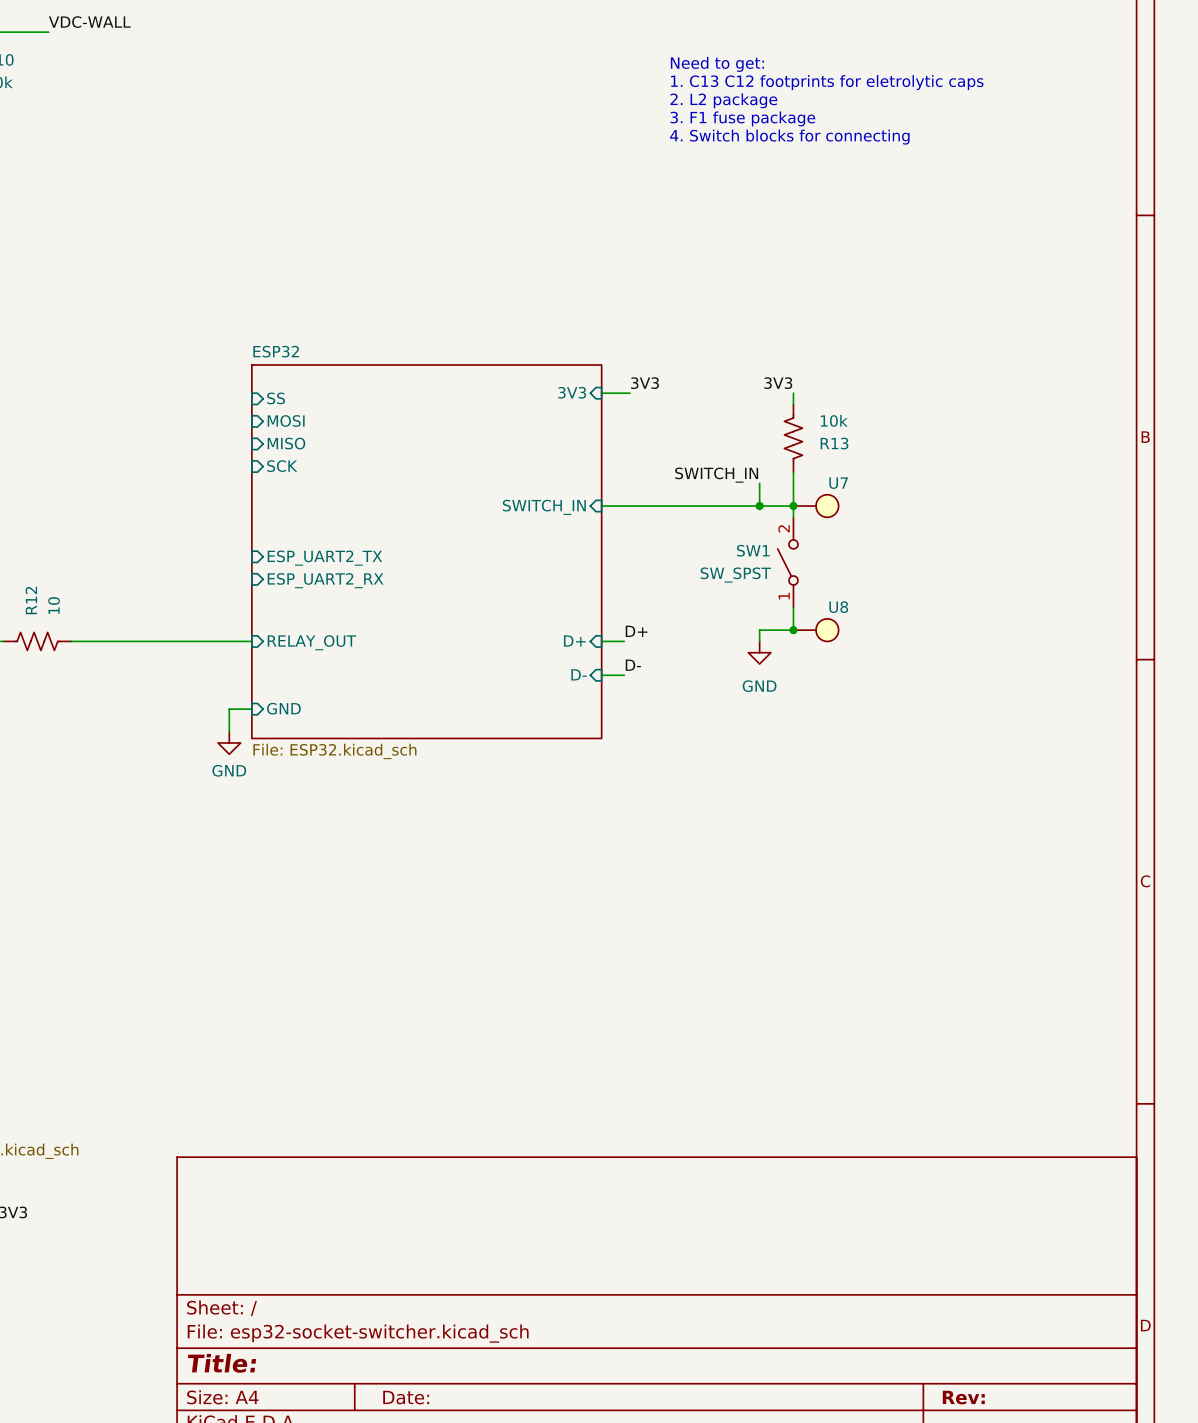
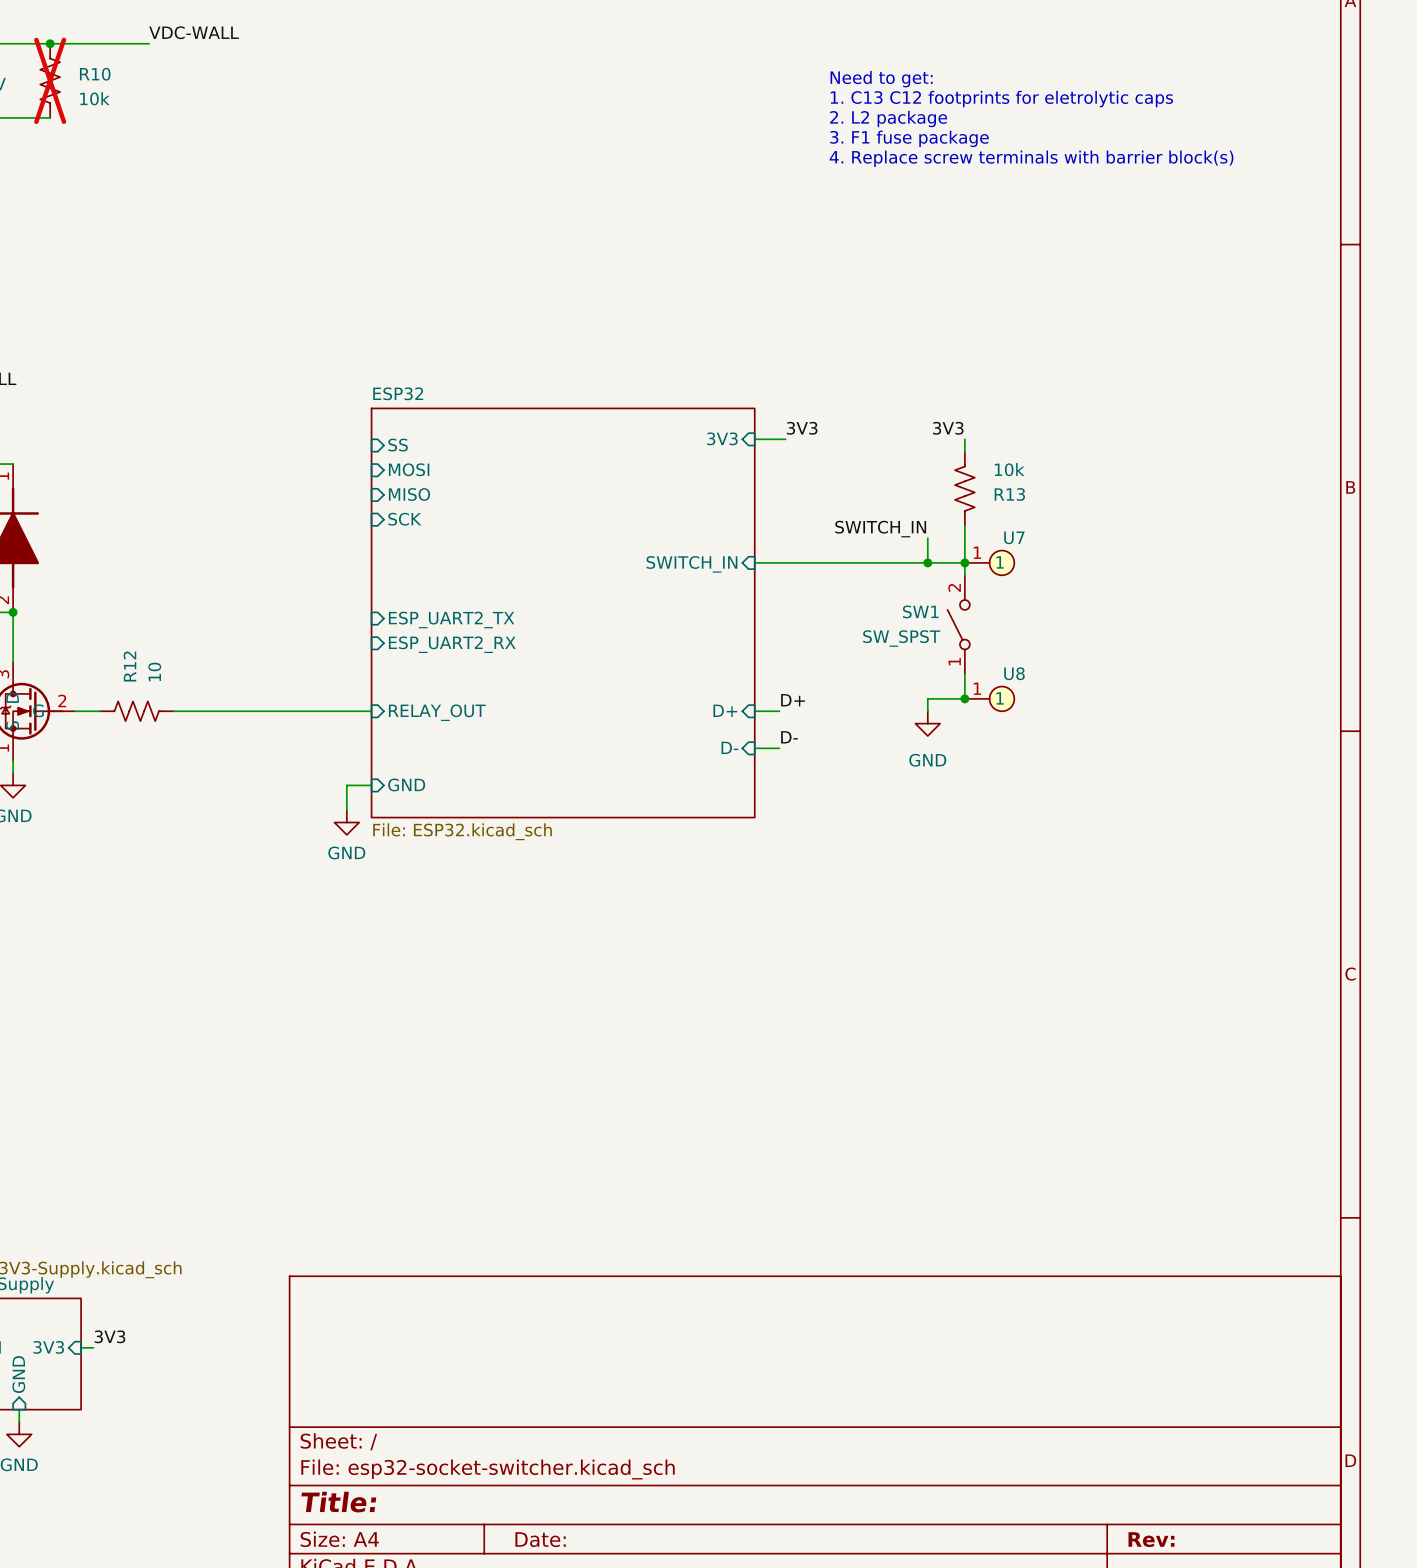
text: 4. Switch blocks for connecting (789, 137) -> 4. Replace screw terminals with barrier block(s) (1031, 158)
U7 pin number: none -> 1 (977, 552)
U7 pin name: none -> 1 (1000, 562)
U8 pin number: none -> 1 (977, 688)
U8 pin name: none -> 1 (1000, 698)

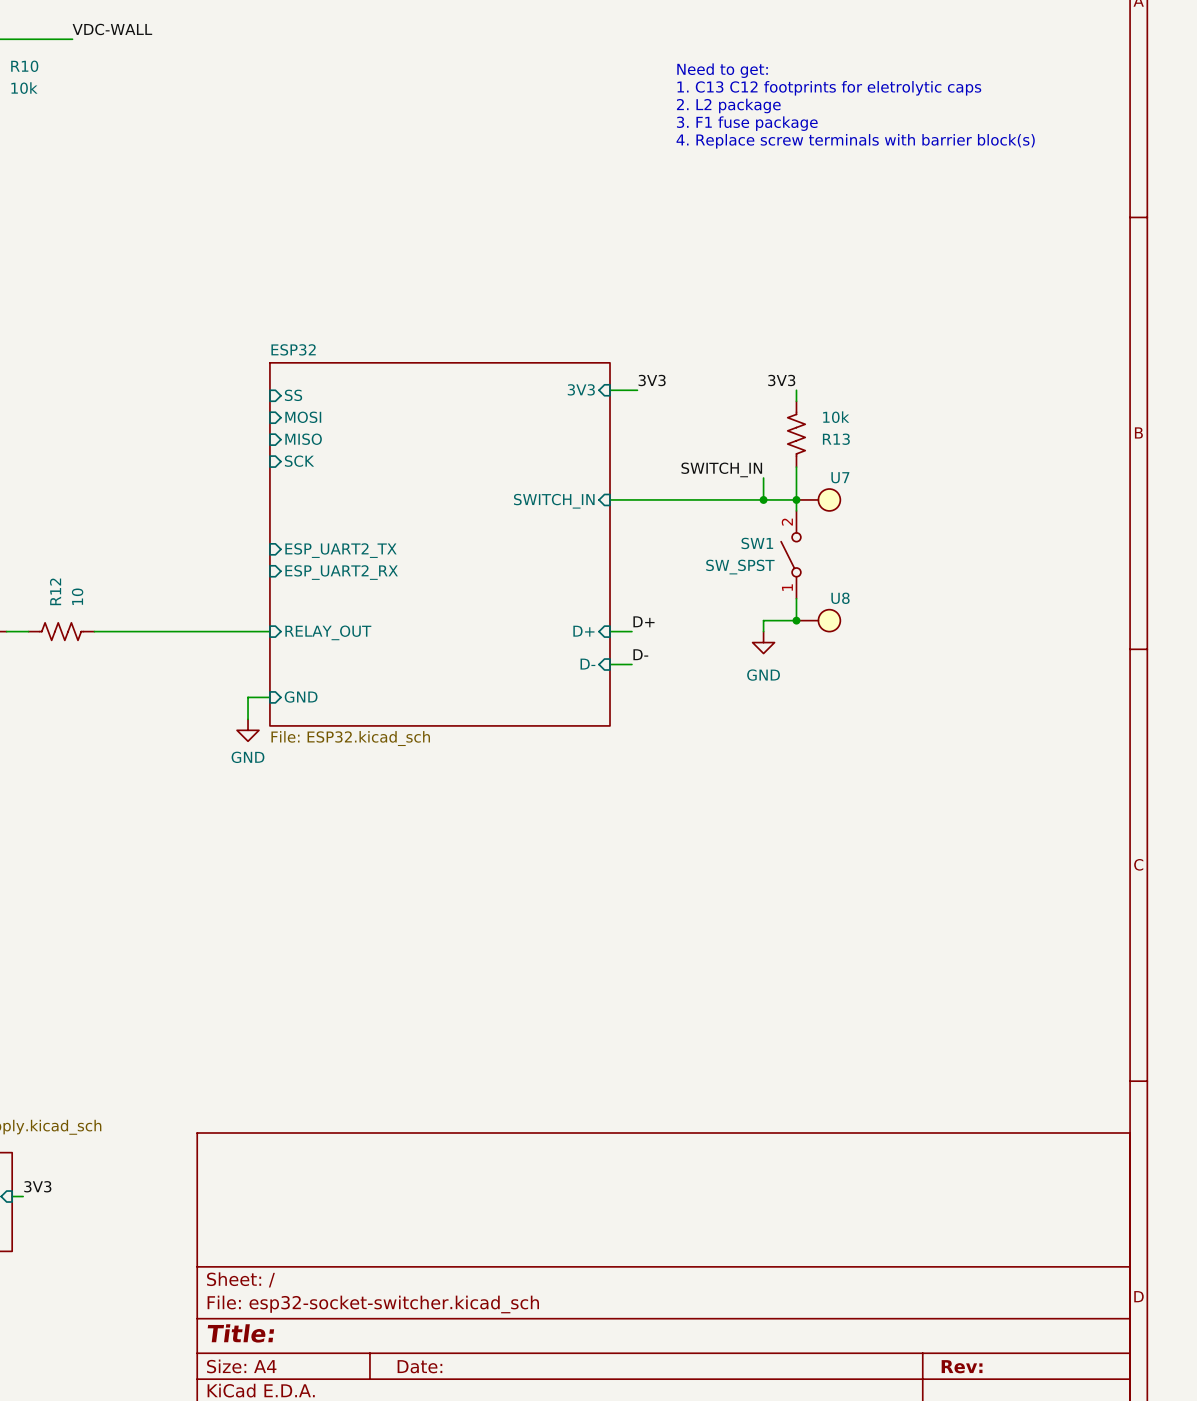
U7 pin number: 1 (977, 552) -> none
U7 pin name: 1 (1000, 562) -> none
U8 pin number: 1 (977, 688) -> none
U8 pin name: 1 (1000, 698) -> none

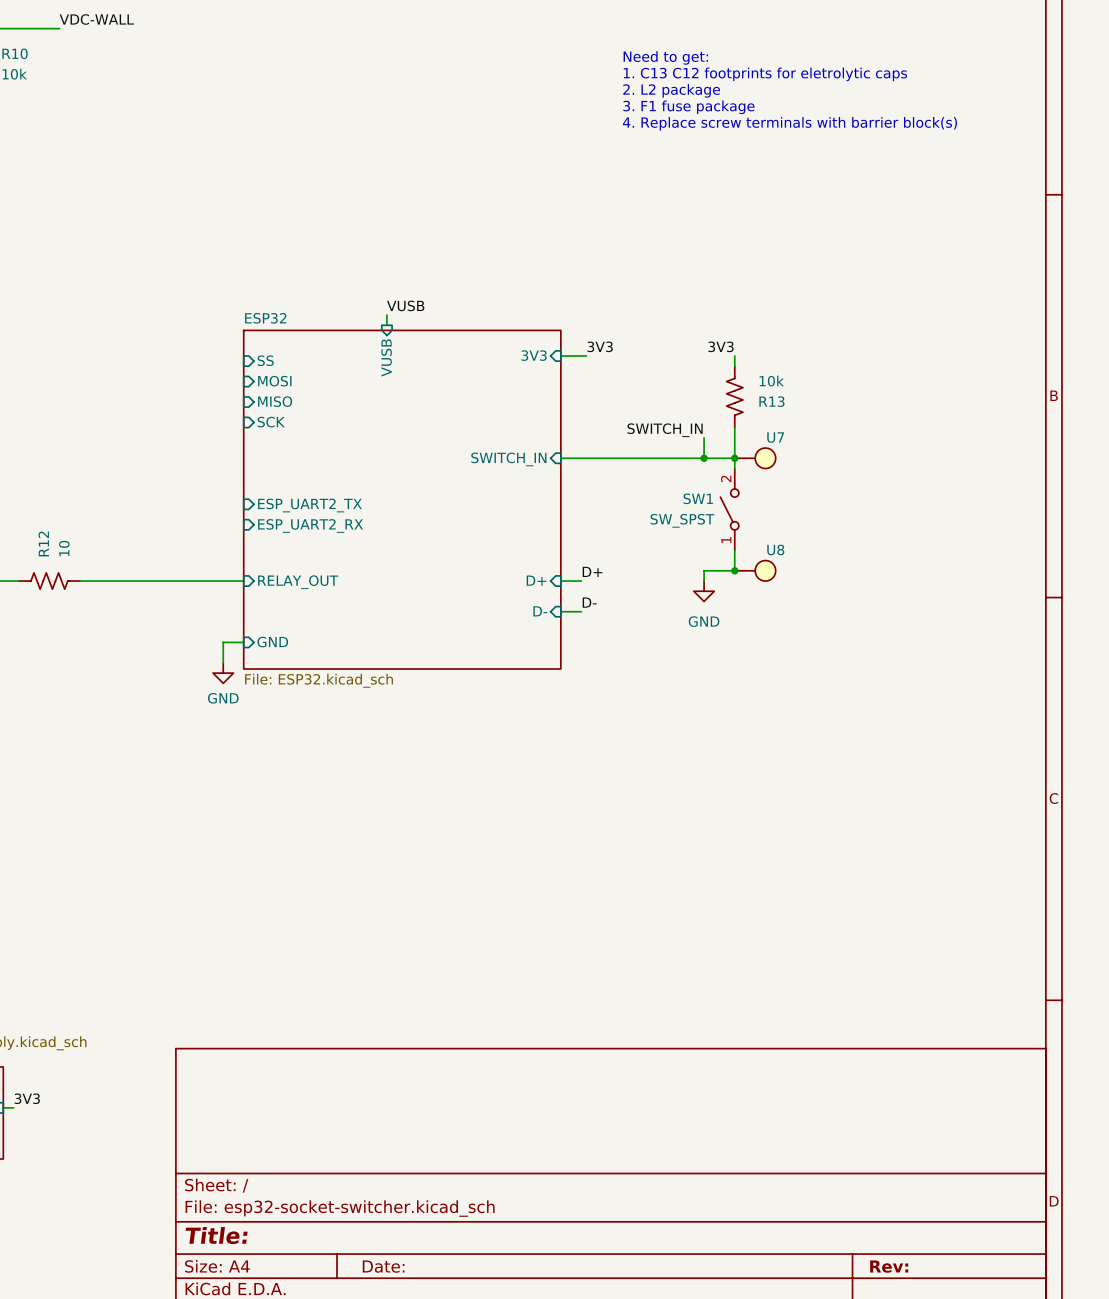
label: none -> VUSB (405, 305)
wire: none -> (386, 315) (386, 325)
sheet pin: none -> VUSB (386, 357)

